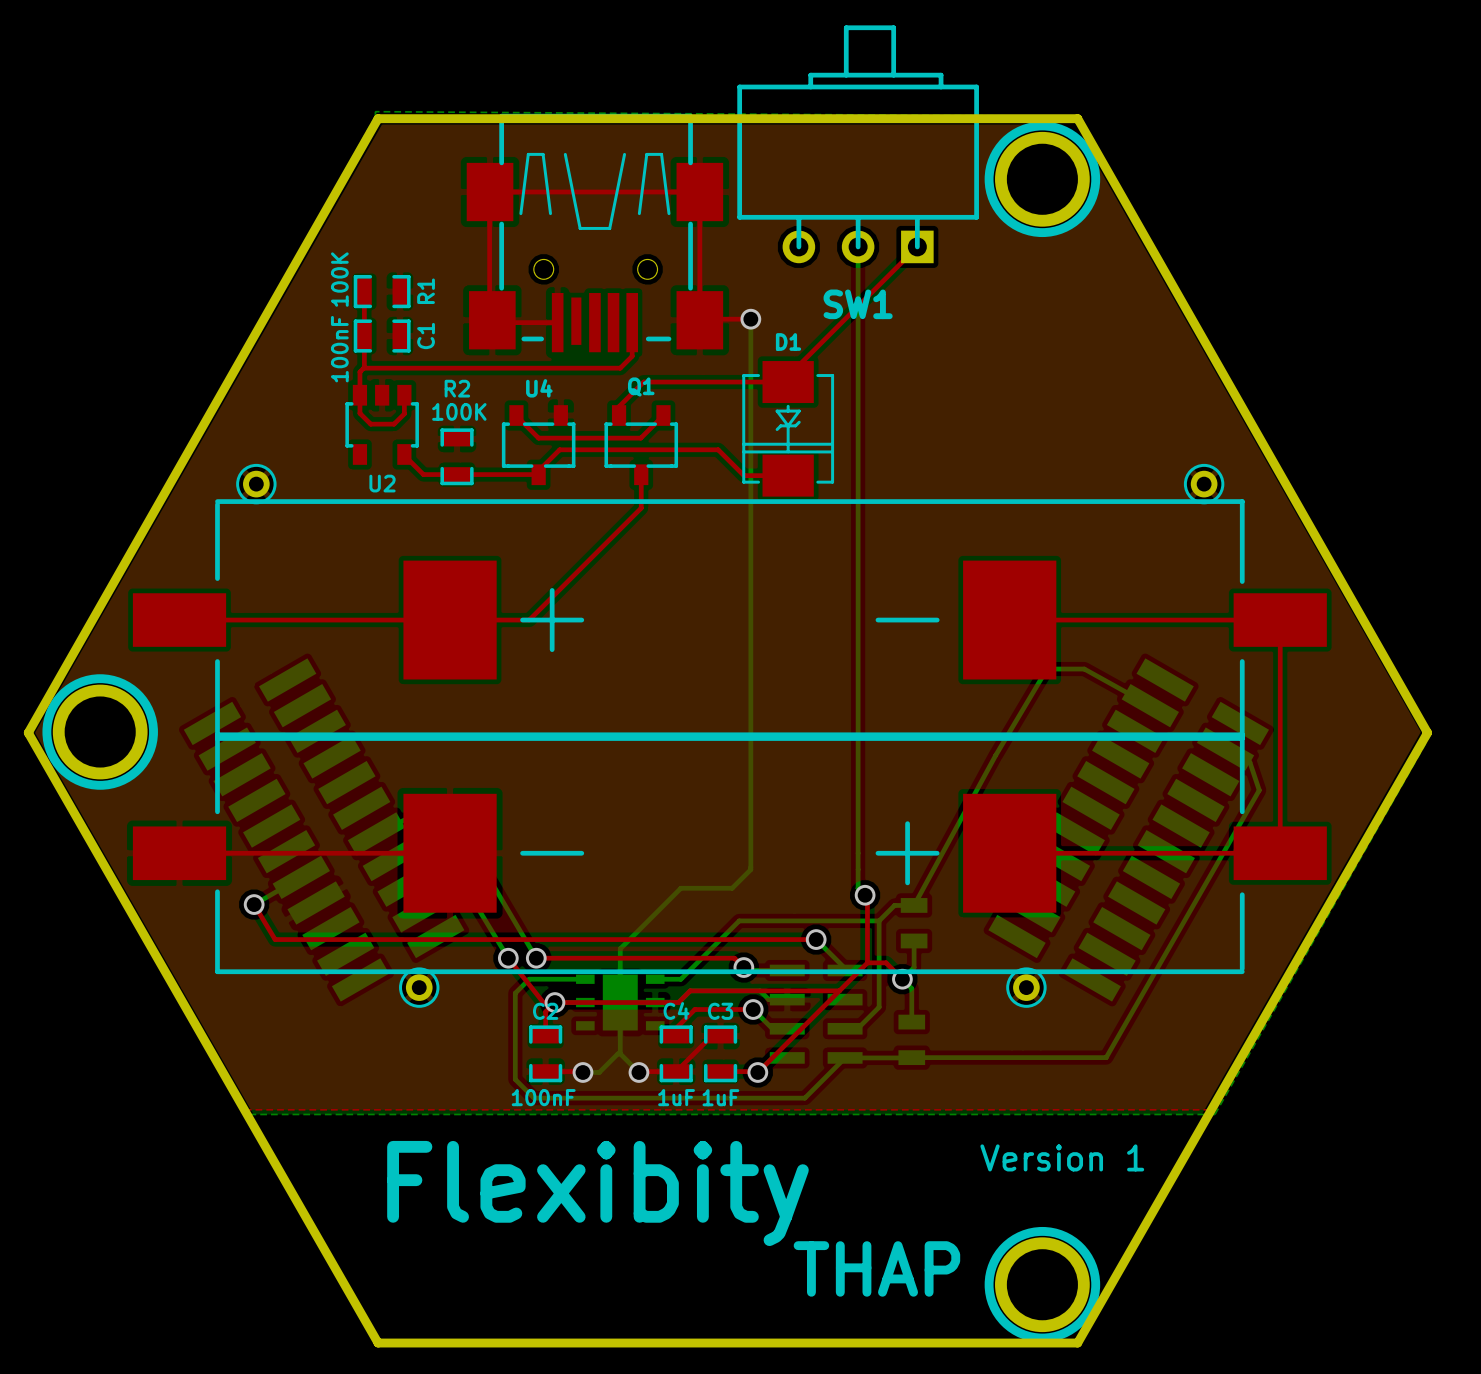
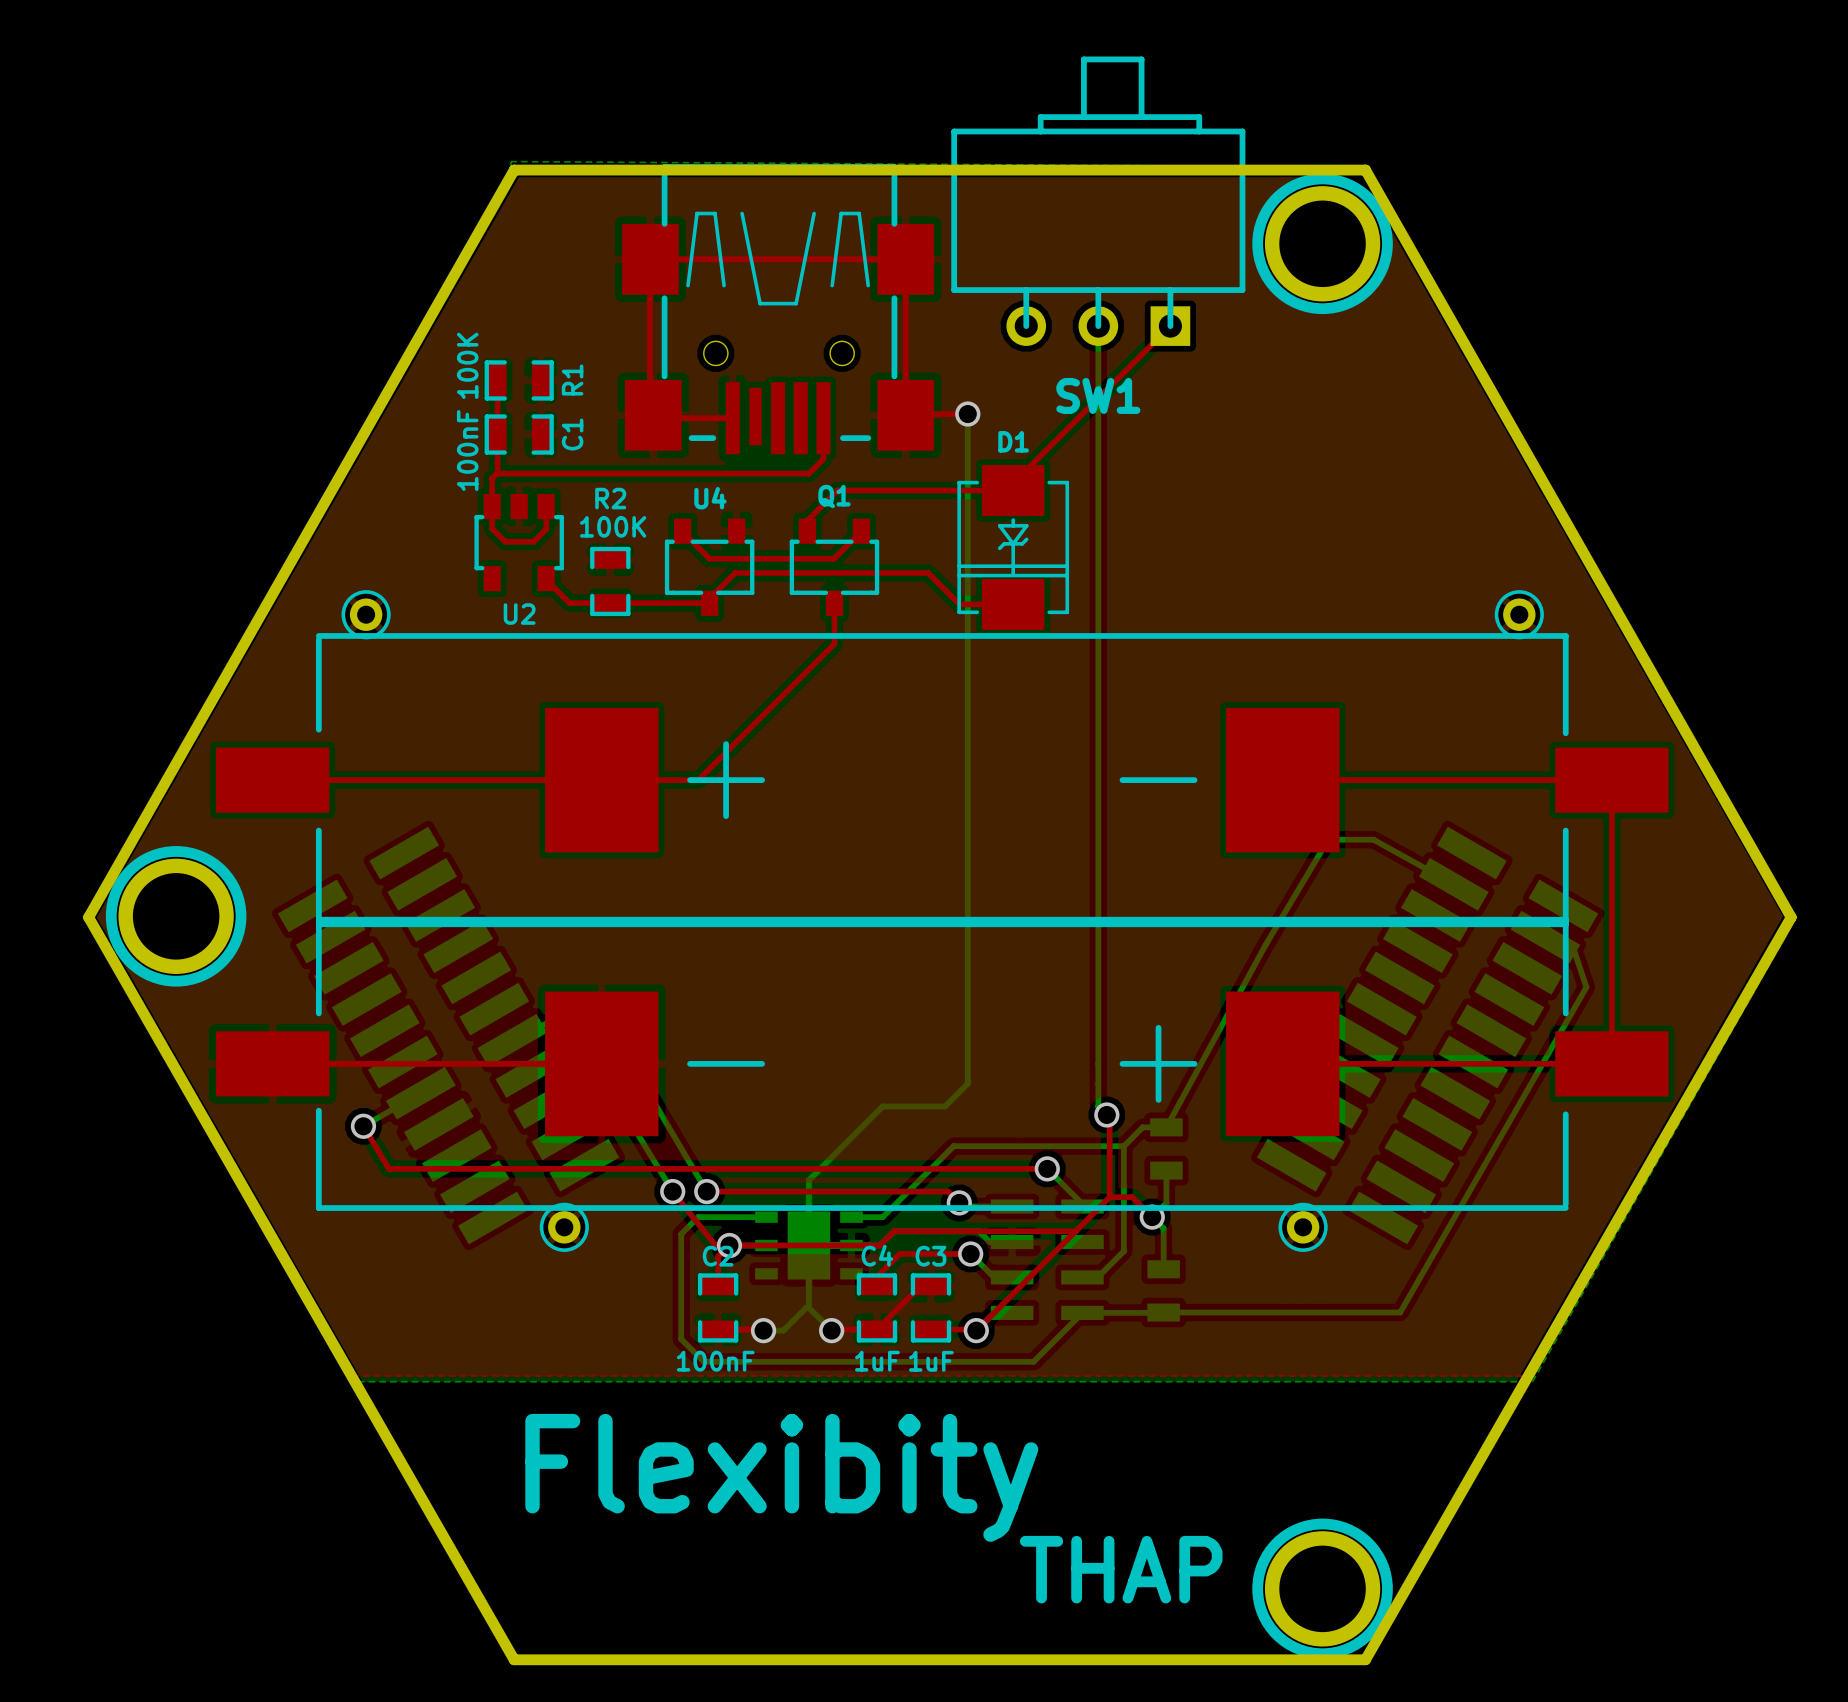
text: Version 1 (1062, 1157) -> none

